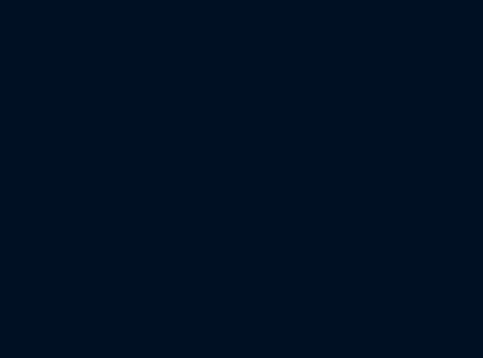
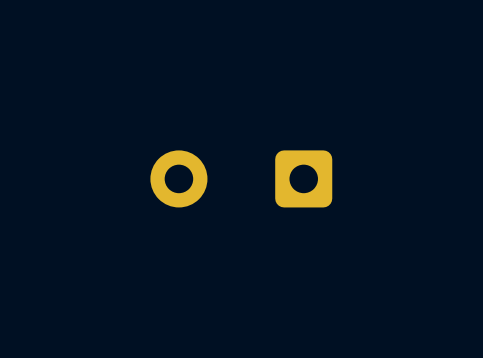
part: none -> (241, 178)

